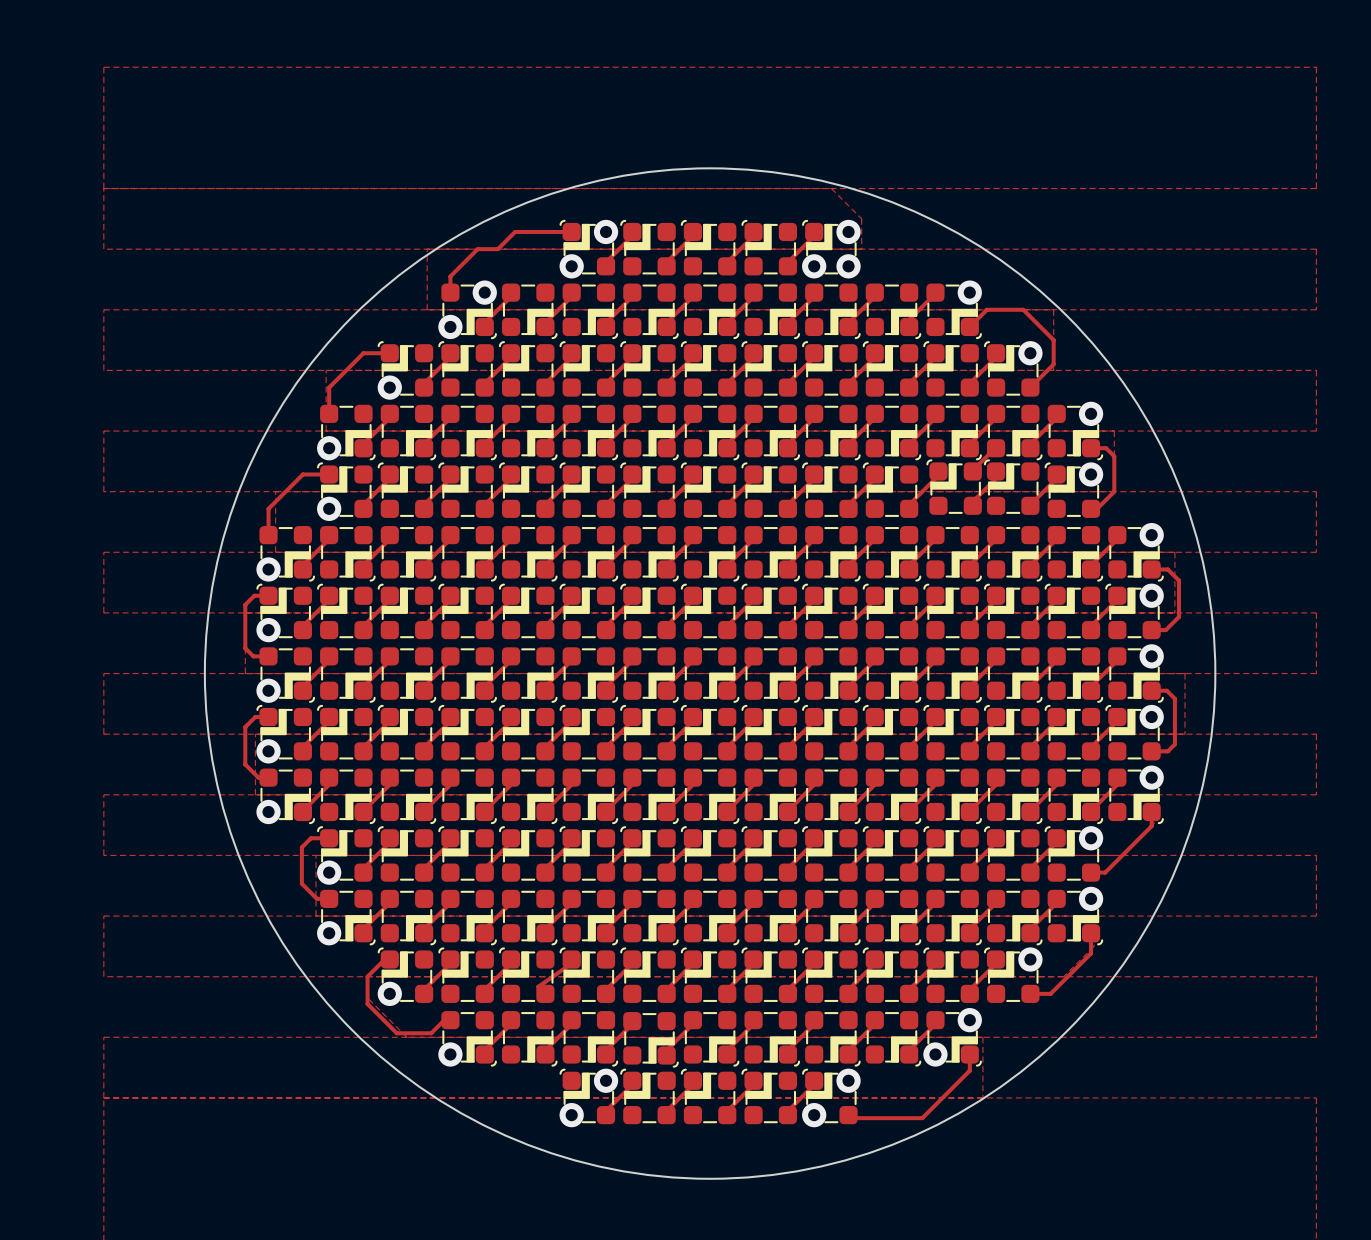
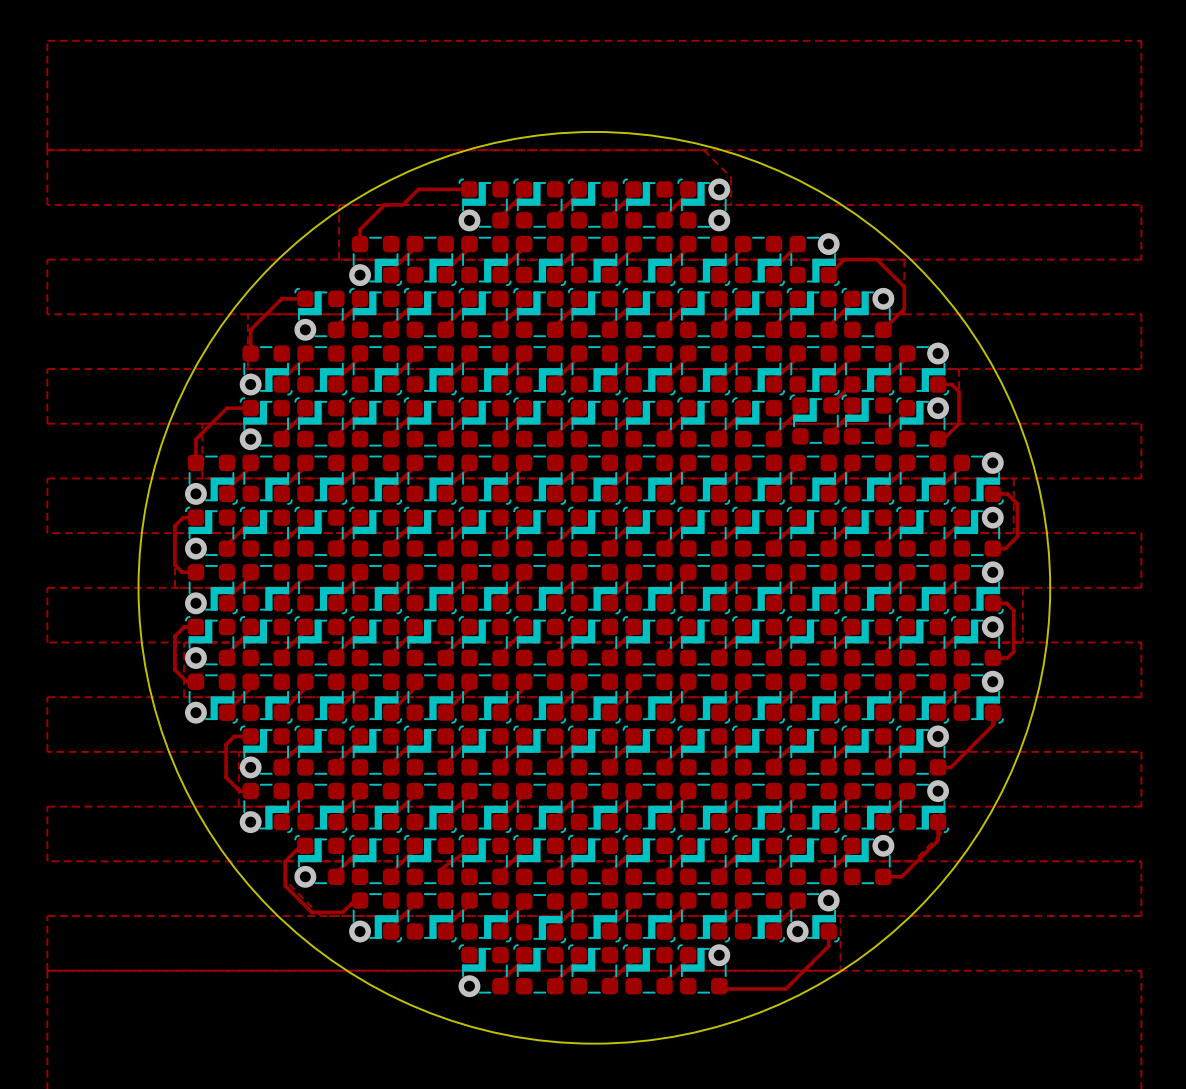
via: (606, 231) -> none
via: (814, 266) -> none
via: (484, 292) -> none
via: (606, 1080) -> none
via: (814, 1115) -> none

